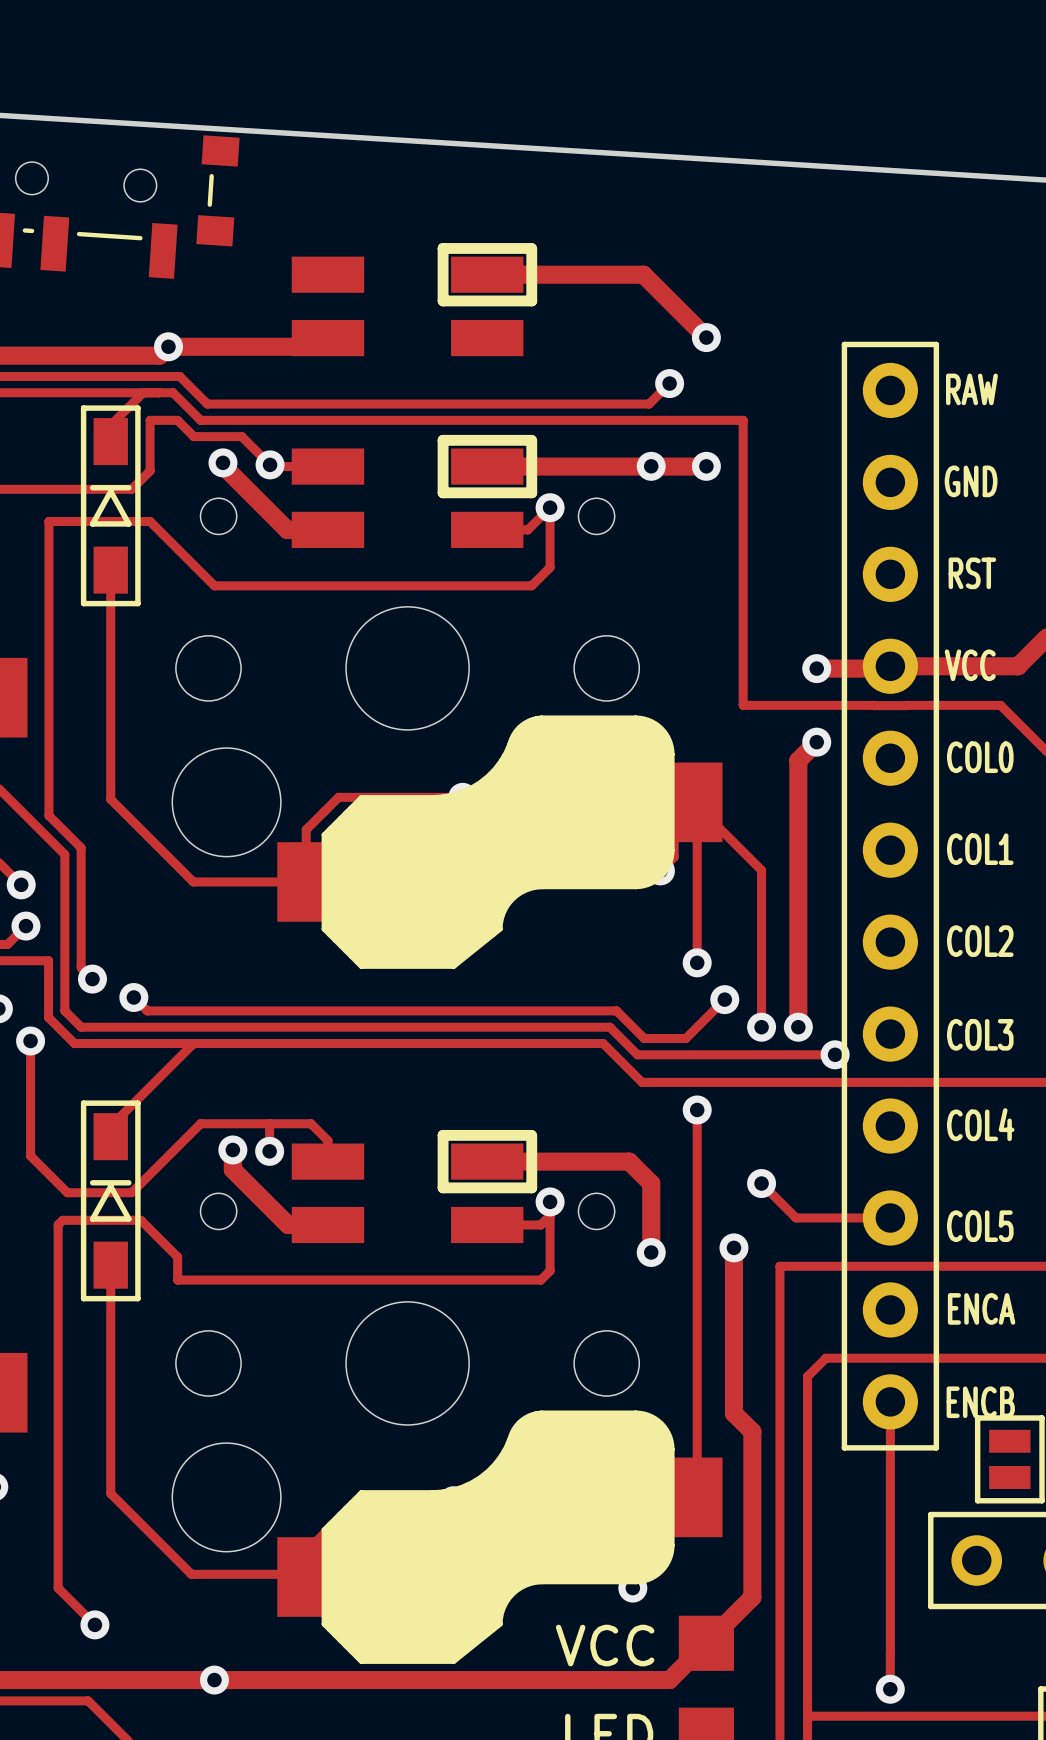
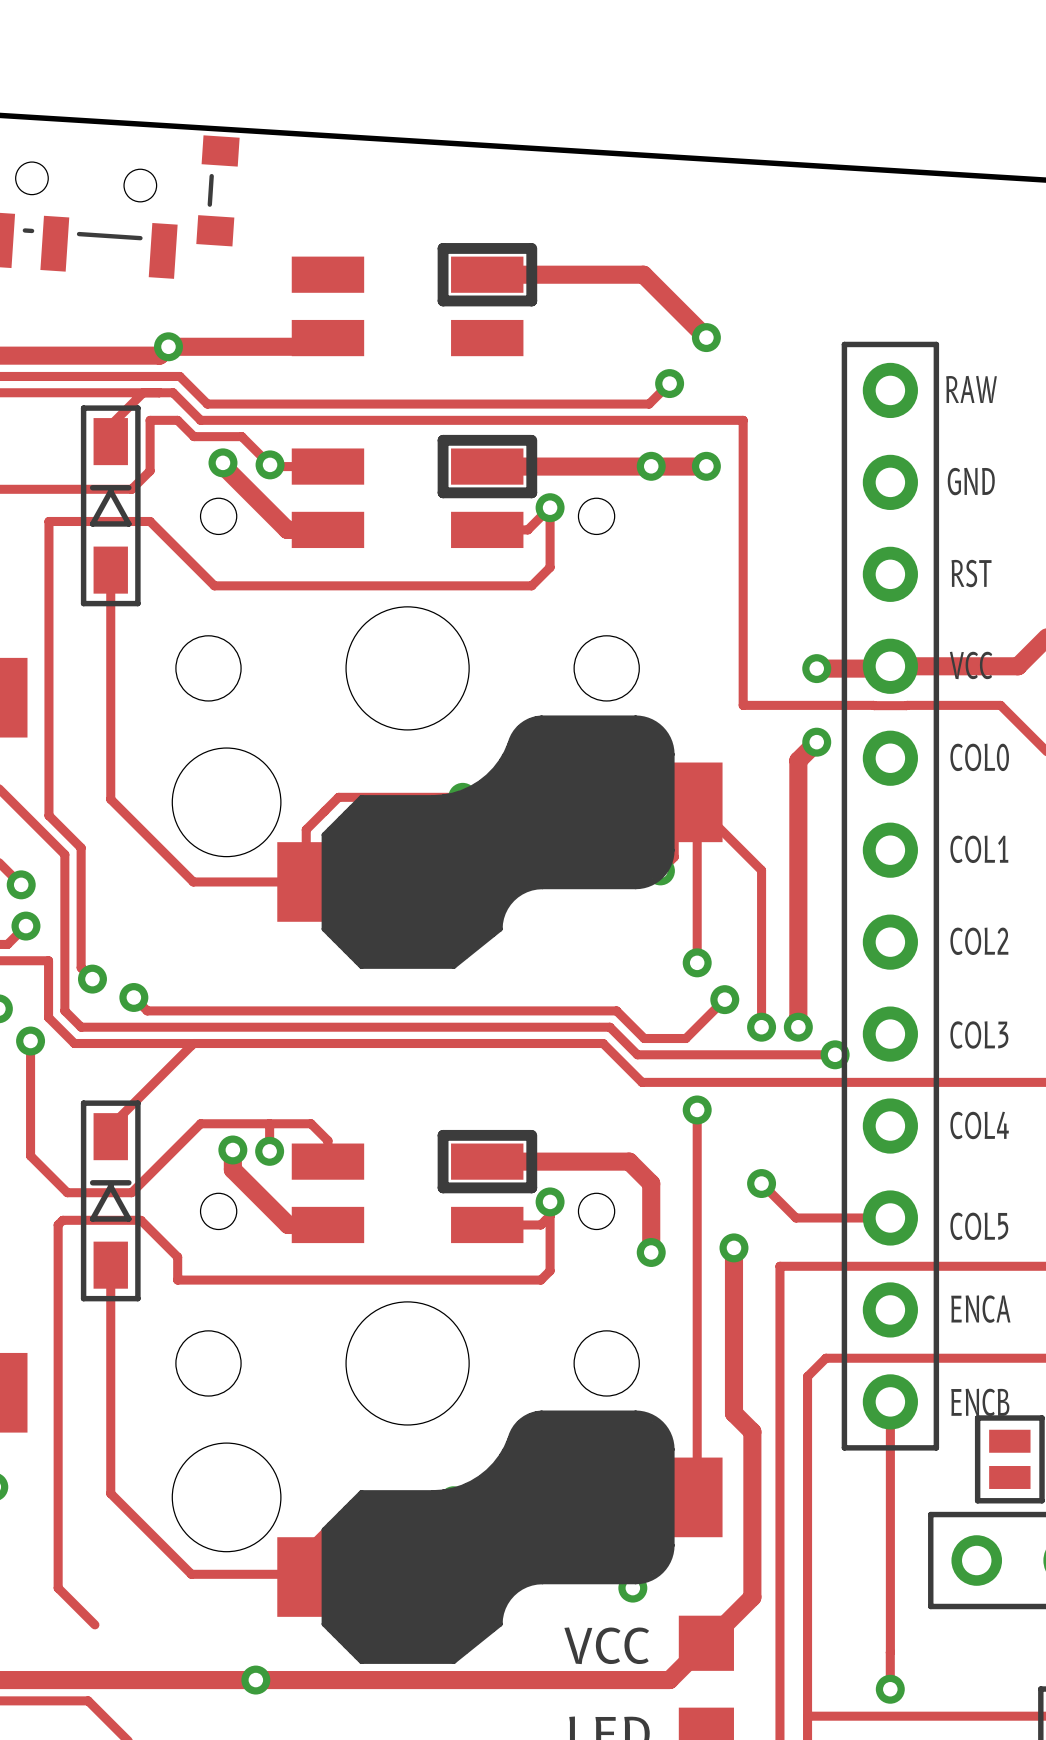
via: (94, 1624) -> none
via position: (214, 1680) -> (255, 1680)

